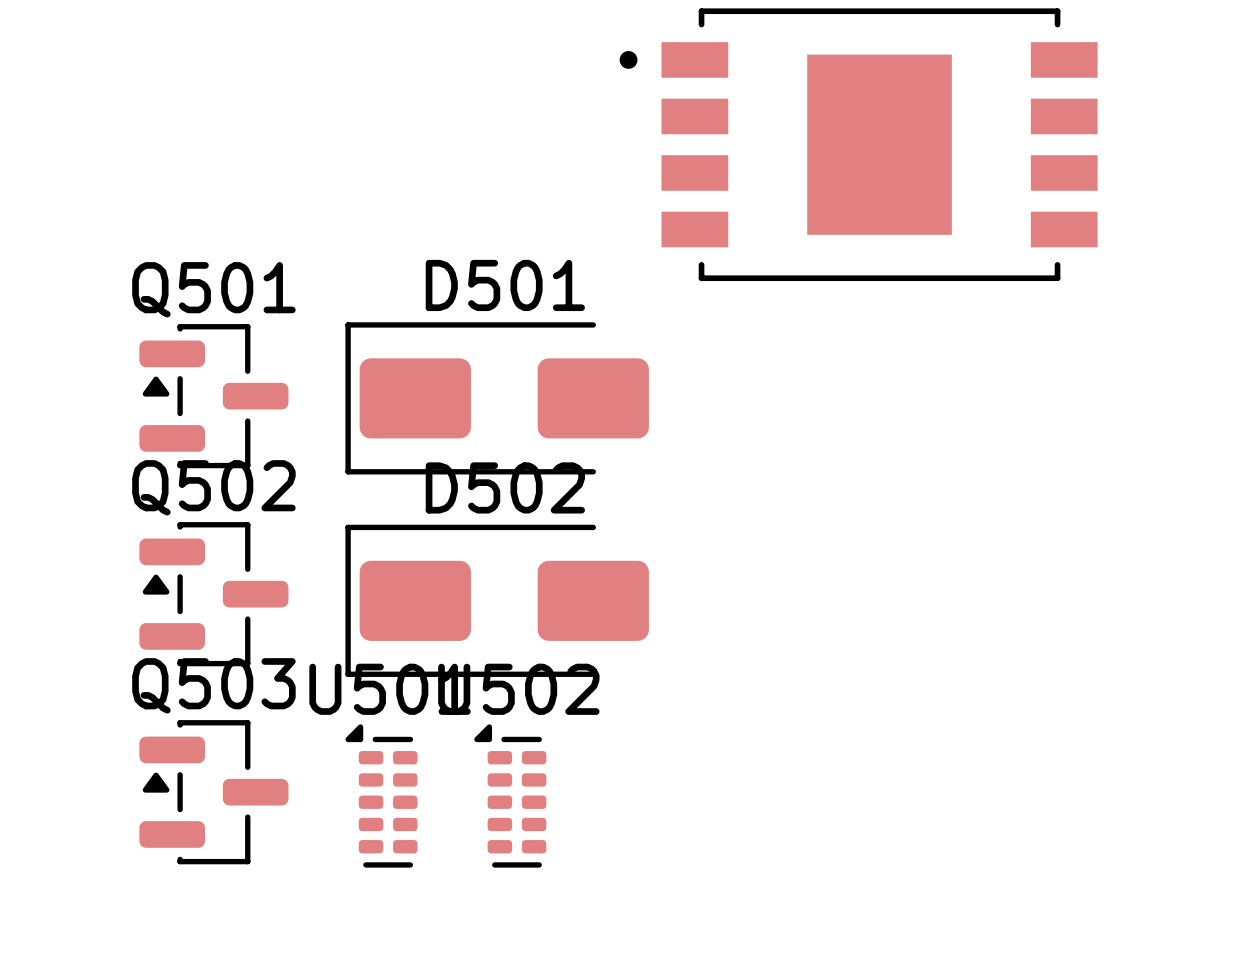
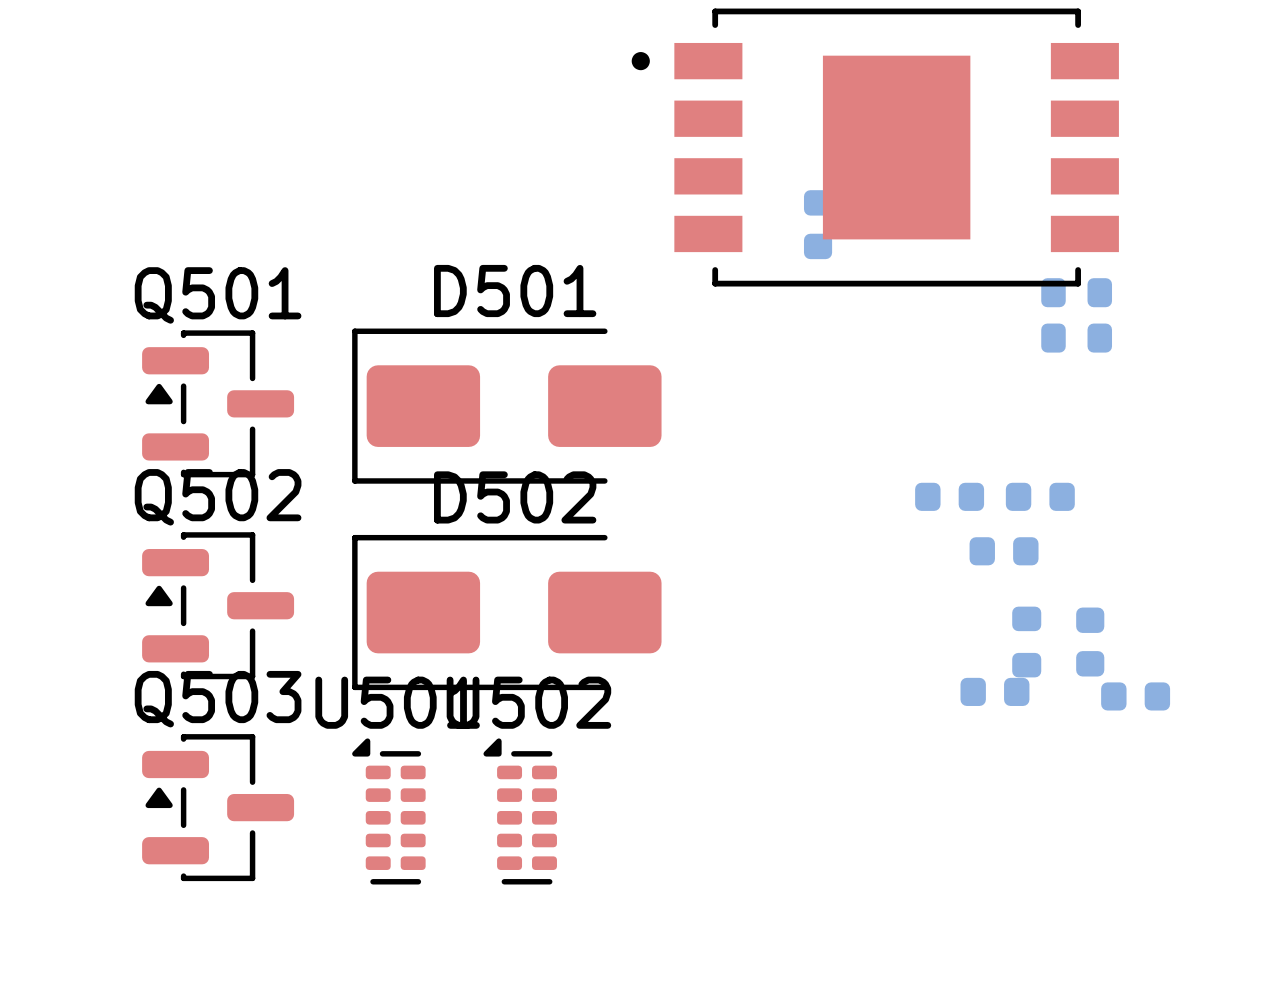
part: none -> (818, 224)
part: none -> (1076, 292)
part: none -> (1076, 338)
part: none -> (949, 496)
part: none -> (1040, 496)
part: none -> (1004, 551)
part: none -> (1026, 642)
part: none -> (1090, 642)
part: none -> (994, 691)
part: none -> (1135, 696)

